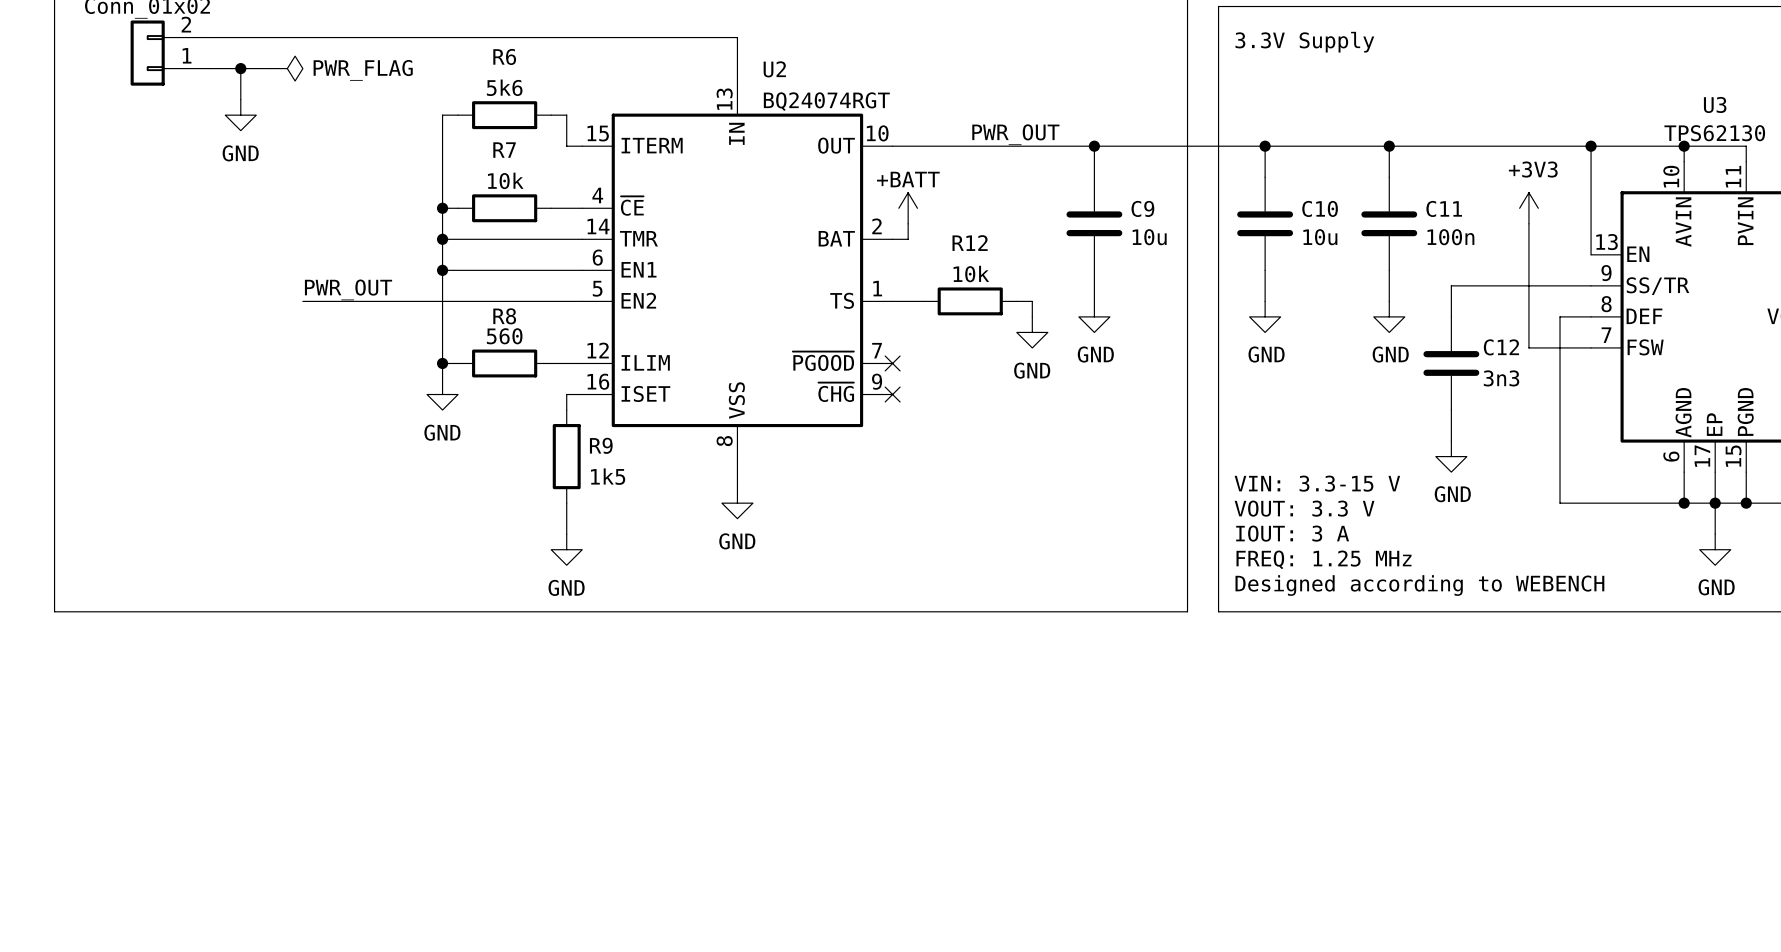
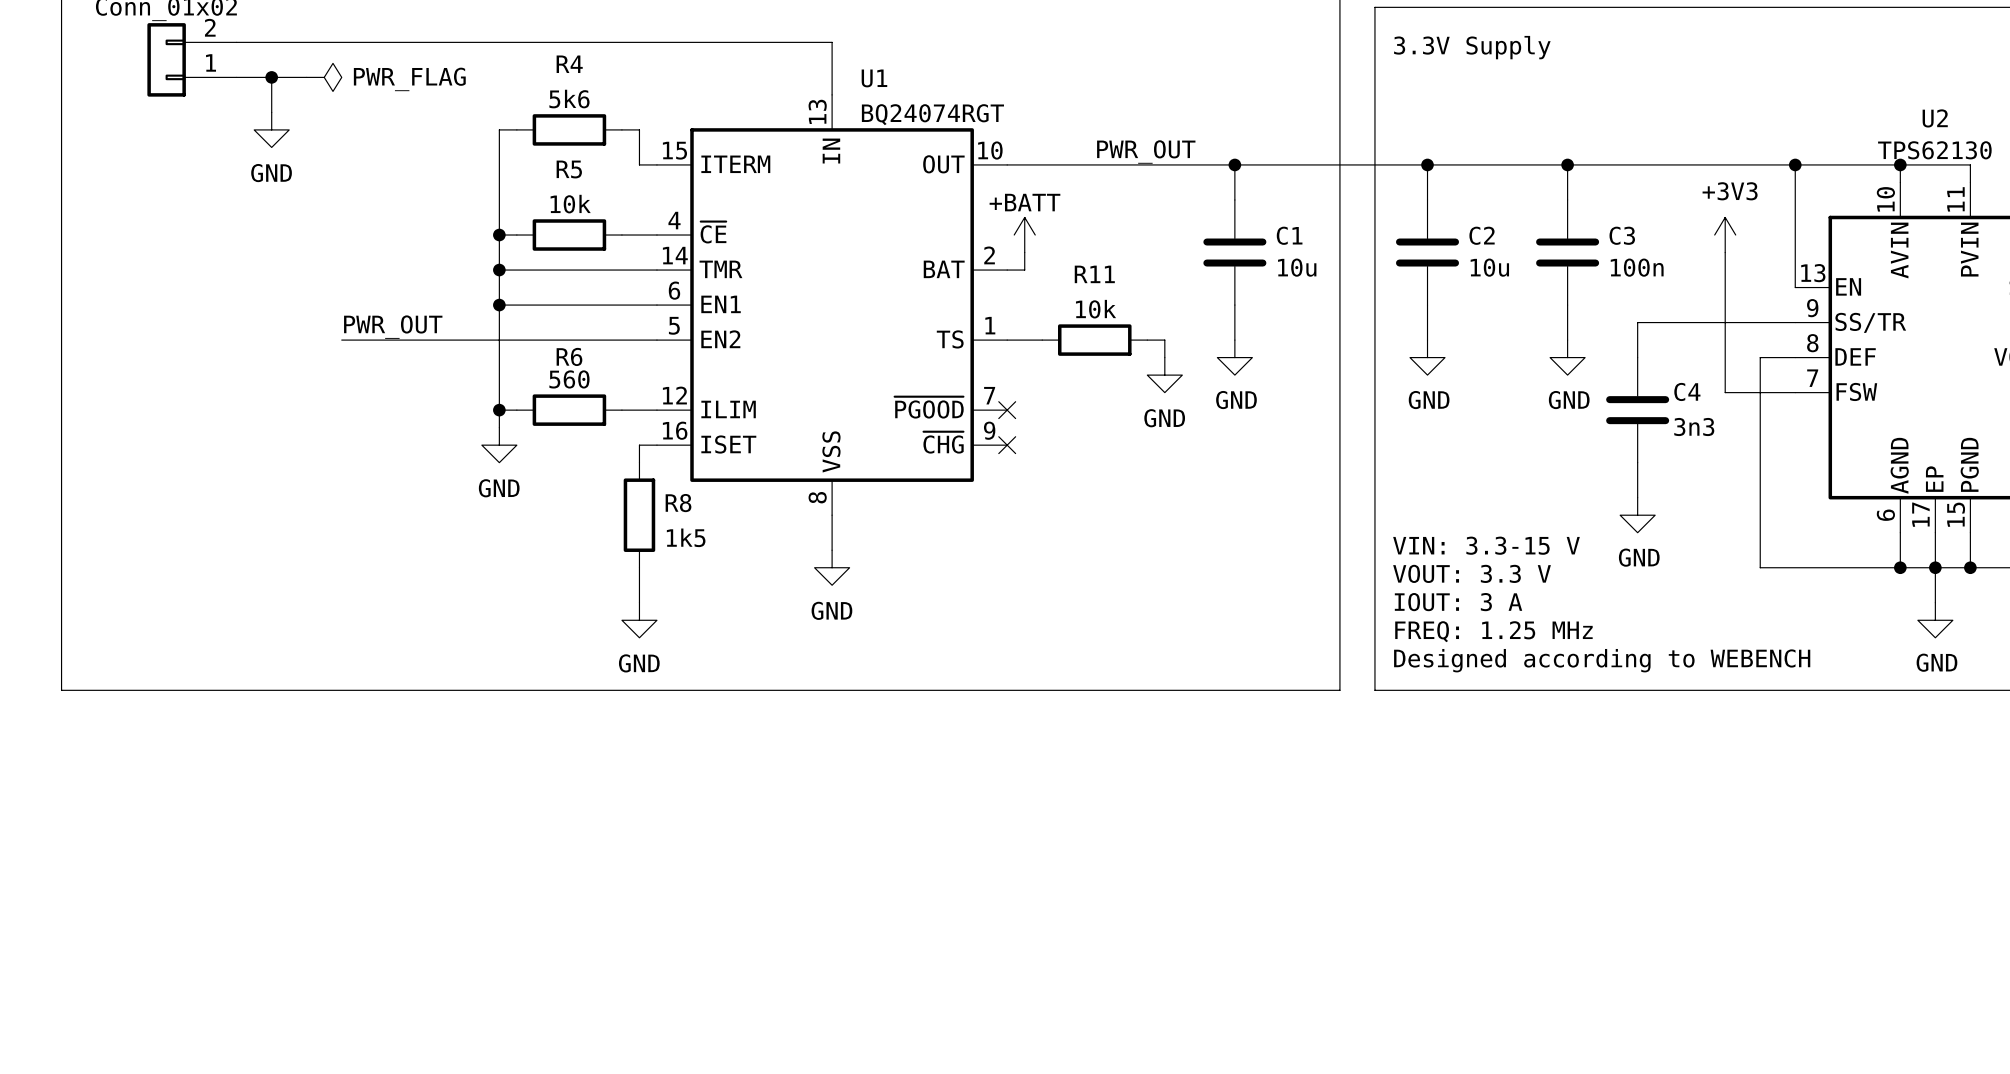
R6 name: R6 (504, 56) -> R4 (569, 64)
U2 name: U2 (774, 69) -> U1 (874, 78)
U3 name: U3 (1715, 104) -> U2 (1935, 118)
R7 name: R7 (504, 150) -> R5 (569, 169)
C9 name: C9 (1142, 208) -> C1 (1289, 235)
C10 name: C10 (1320, 208) -> C2 (1482, 235)
C11 name: C11 (1444, 208) -> C3 (1622, 235)
R12 name: R12 (970, 243) -> R11 (1094, 274)
R8 name: R8 (504, 316) -> R6 (569, 356)
C12 name: C12 (1501, 347) -> C4 (1687, 391)
R9 name: R9 (601, 445) -> R8 (678, 503)

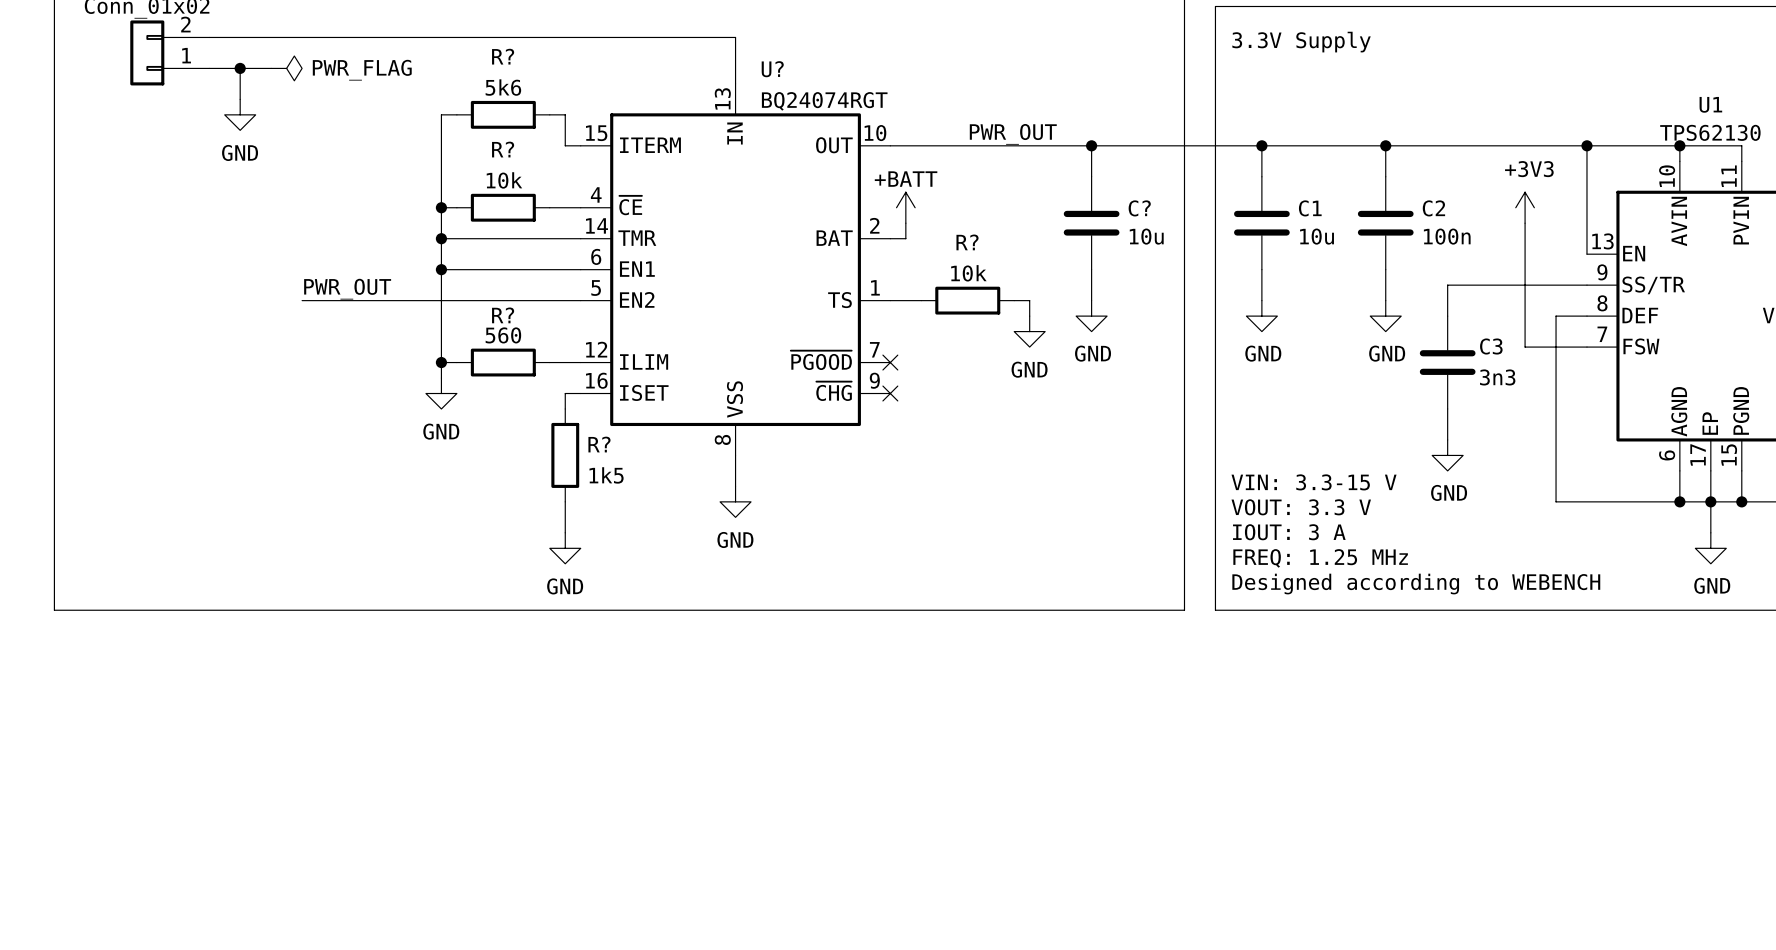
R4 name: R4 (569, 64) -> R? (503, 56)
U1 name: U1 (874, 78) -> U? (772, 69)
U2 name: U2 (1935, 118) -> U1 (1710, 104)
R5 name: R5 (569, 169) -> R? (503, 149)
C1 name: C1 (1289, 235) -> C? (1139, 208)
C2 name: C2 (1482, 235) -> C1 (1310, 208)
C3 name: C3 (1622, 235) -> C2 (1433, 208)
R11 name: R11 (1094, 274) -> R? (967, 242)
R6 name: R6 (569, 356) -> R? (503, 315)
C4 name: C4 (1687, 391) -> C3 (1491, 346)
R8 name: R8 (678, 503) -> R? (599, 444)

